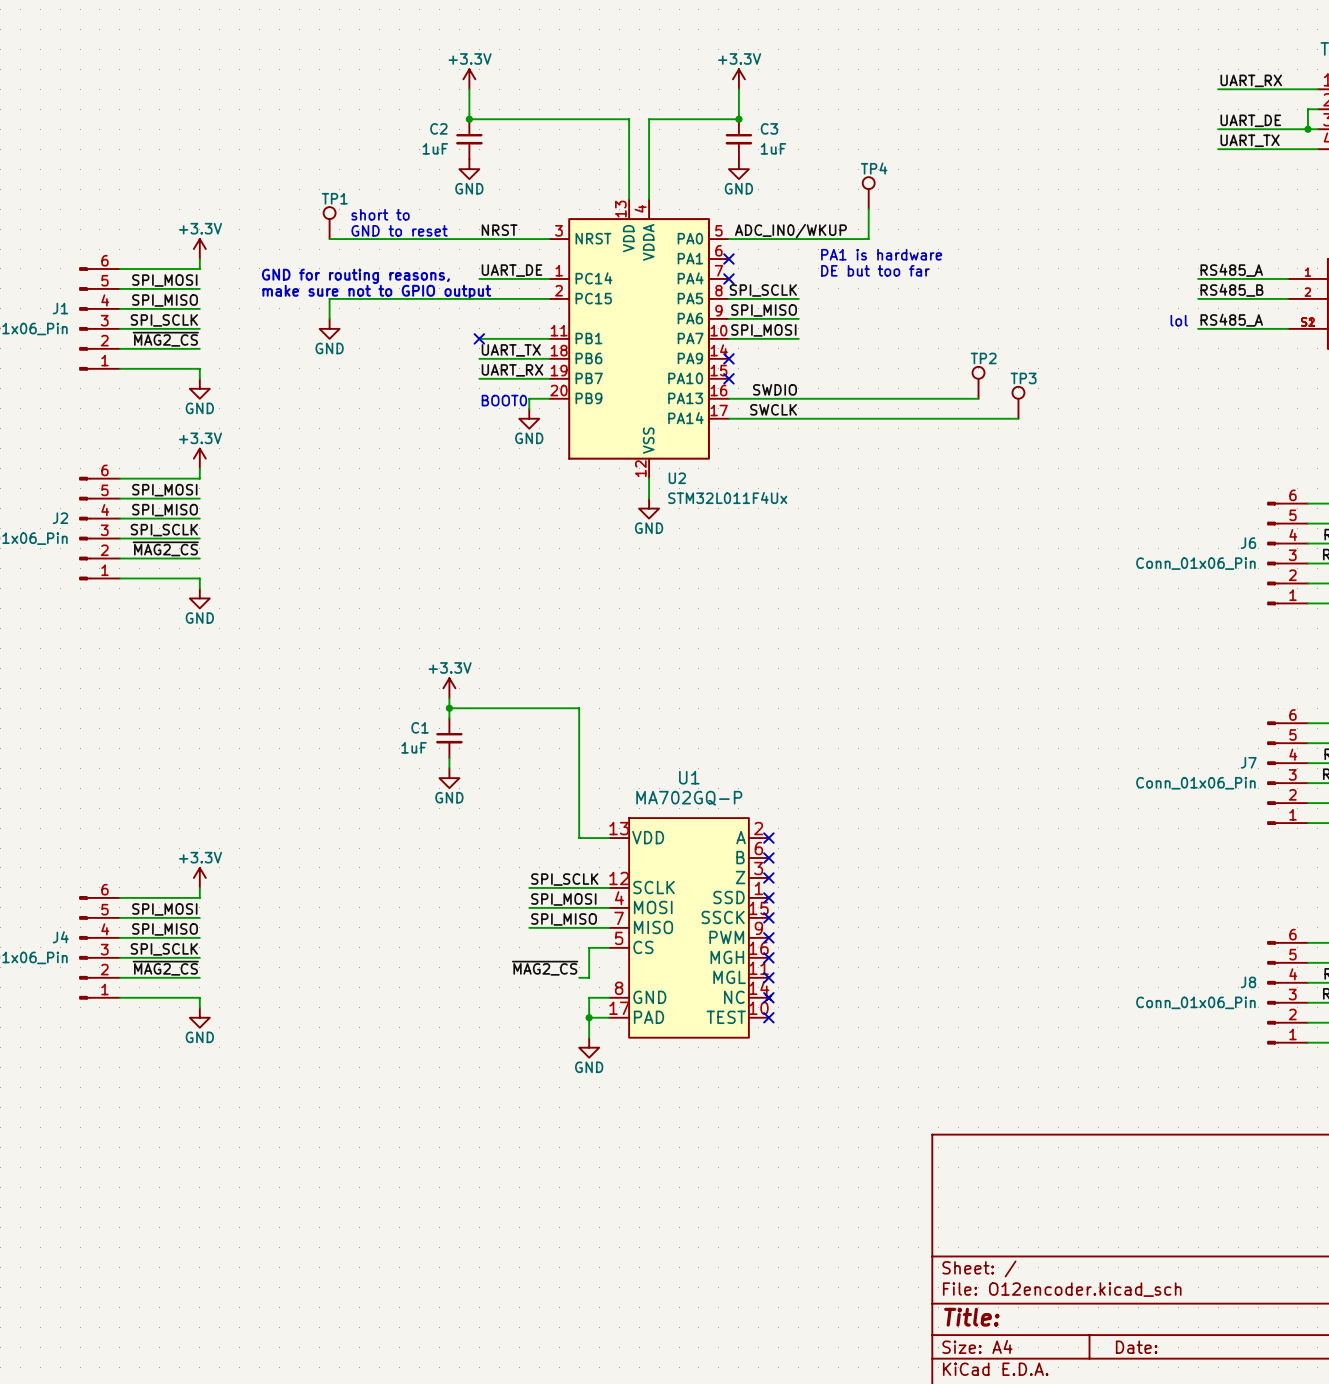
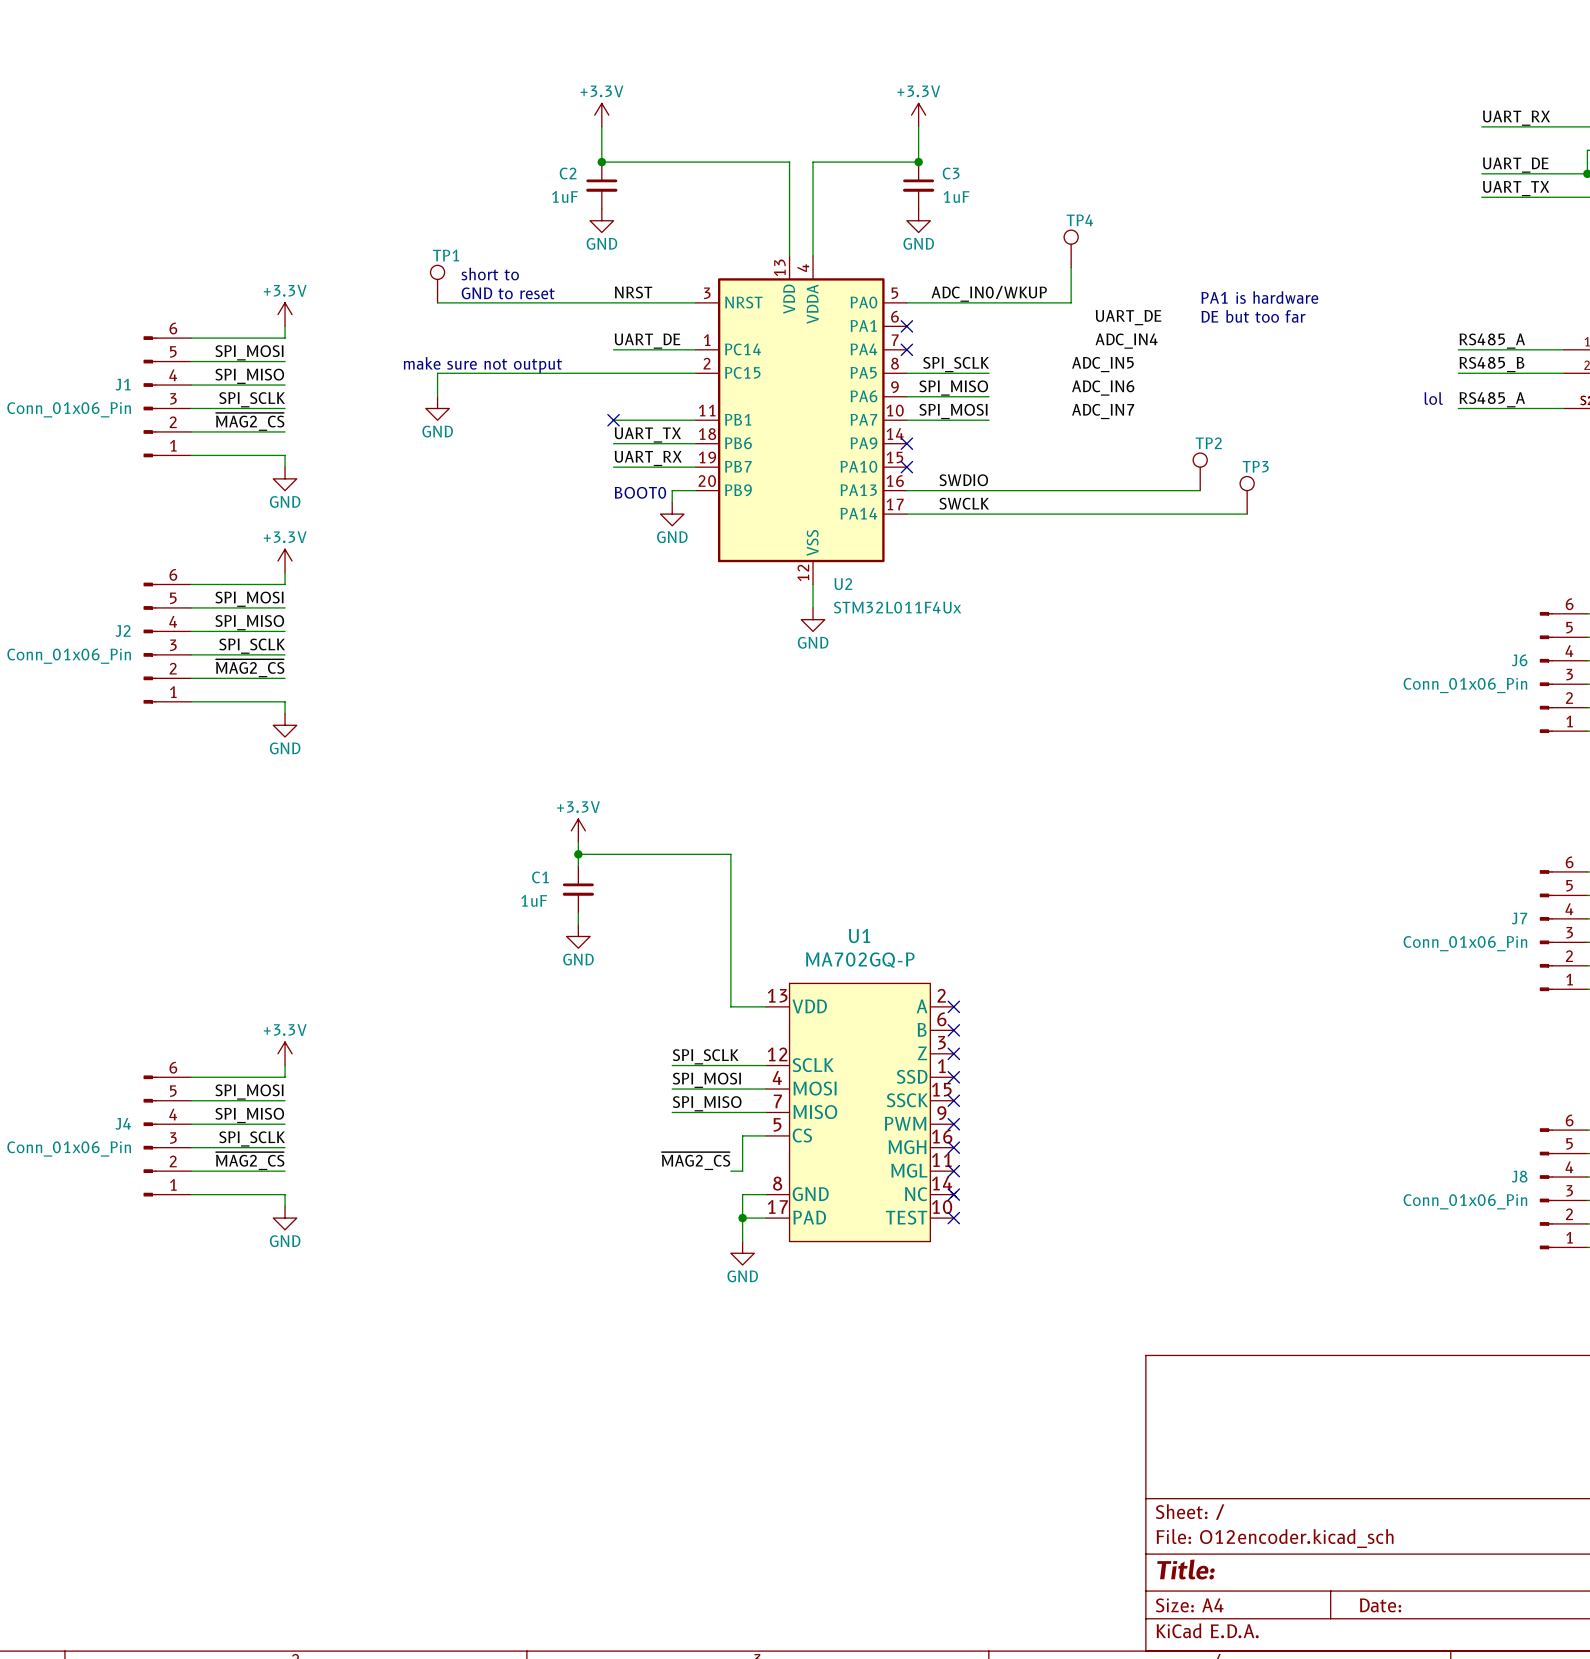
label: none -> UART_DE (1128, 317)
text position: PA1 is hardware (881, 254) -> PA1 is hardware (1259, 297)
text position: DE but too far (875, 270) -> DE but too far (1253, 316)
label: none -> ADC_IN4 (1126, 341)
text: GND for routing reasons, (355, 276) -> none
label: none -> ADC_IN5 (1102, 364)
text: make sure not to GPIO output (376, 292) -> make sure not output (482, 365)
label: none -> ADC_IN6 (1103, 388)
label: none -> ADC_IN7 (1103, 411)

